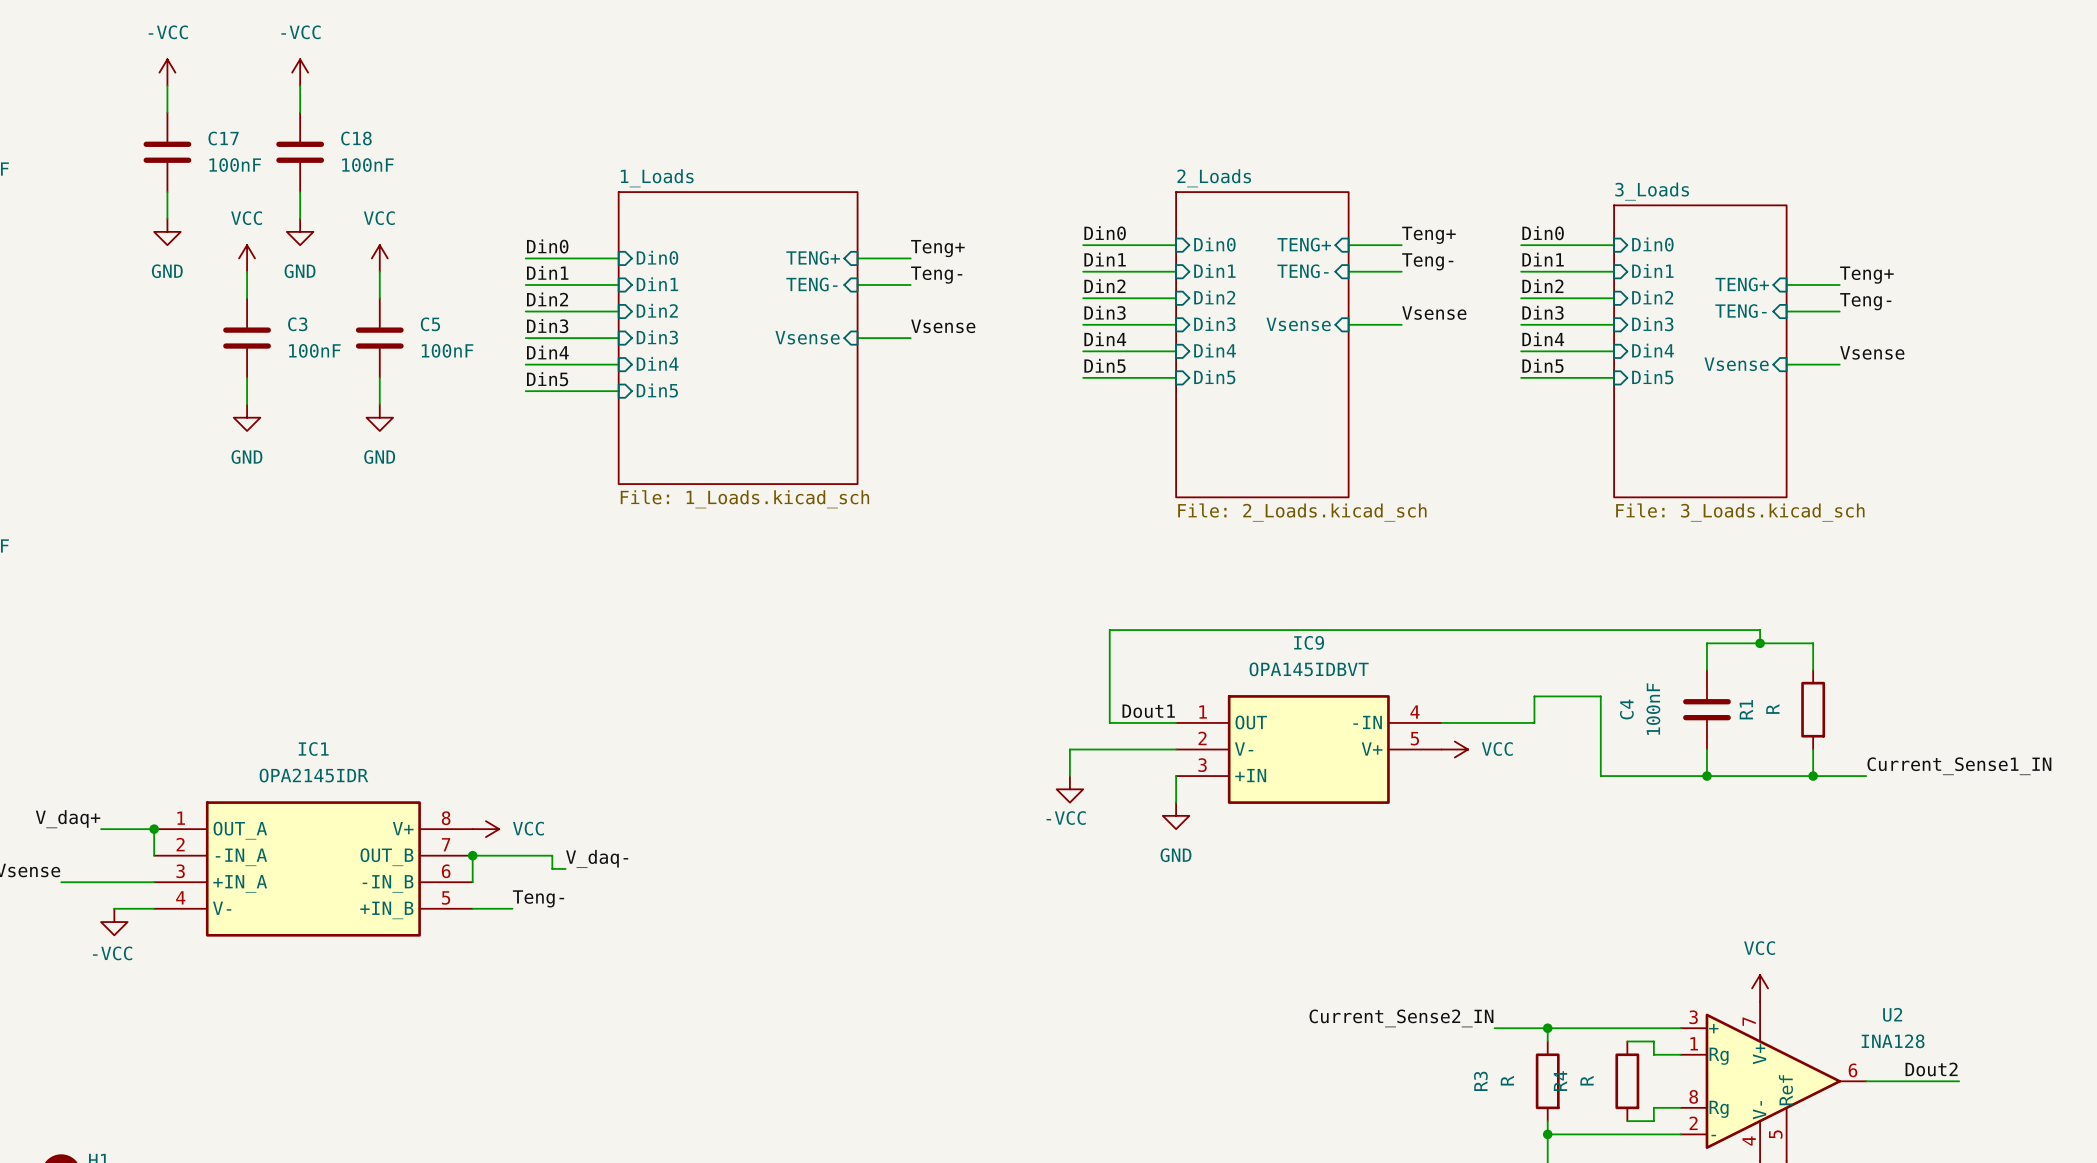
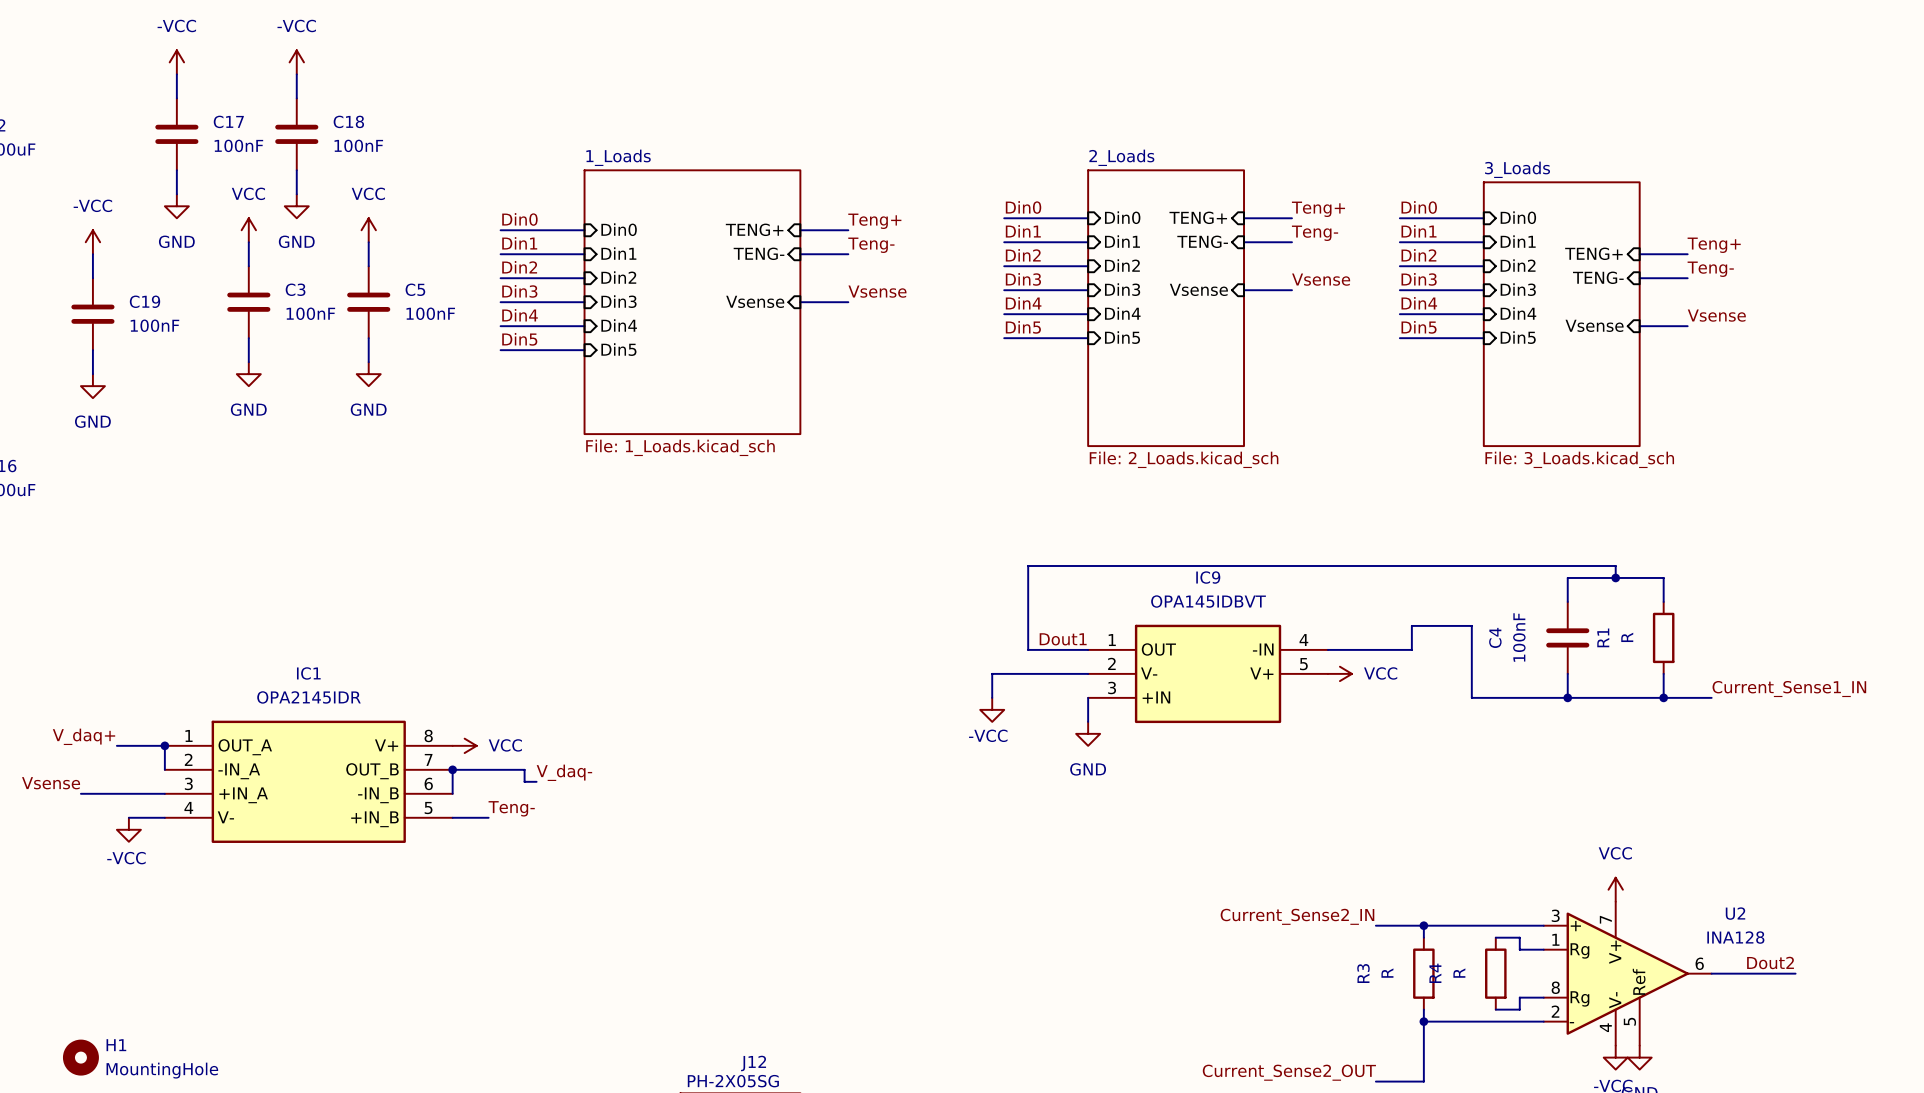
power symbol: none -> -VCC (92, 242)
wire: none -> (92, 254) (92, 278)
C19: none -> 100nF (92, 314)
wire: none -> (92, 350) (92, 374)
power symbol: none -> GND (92, 386)

